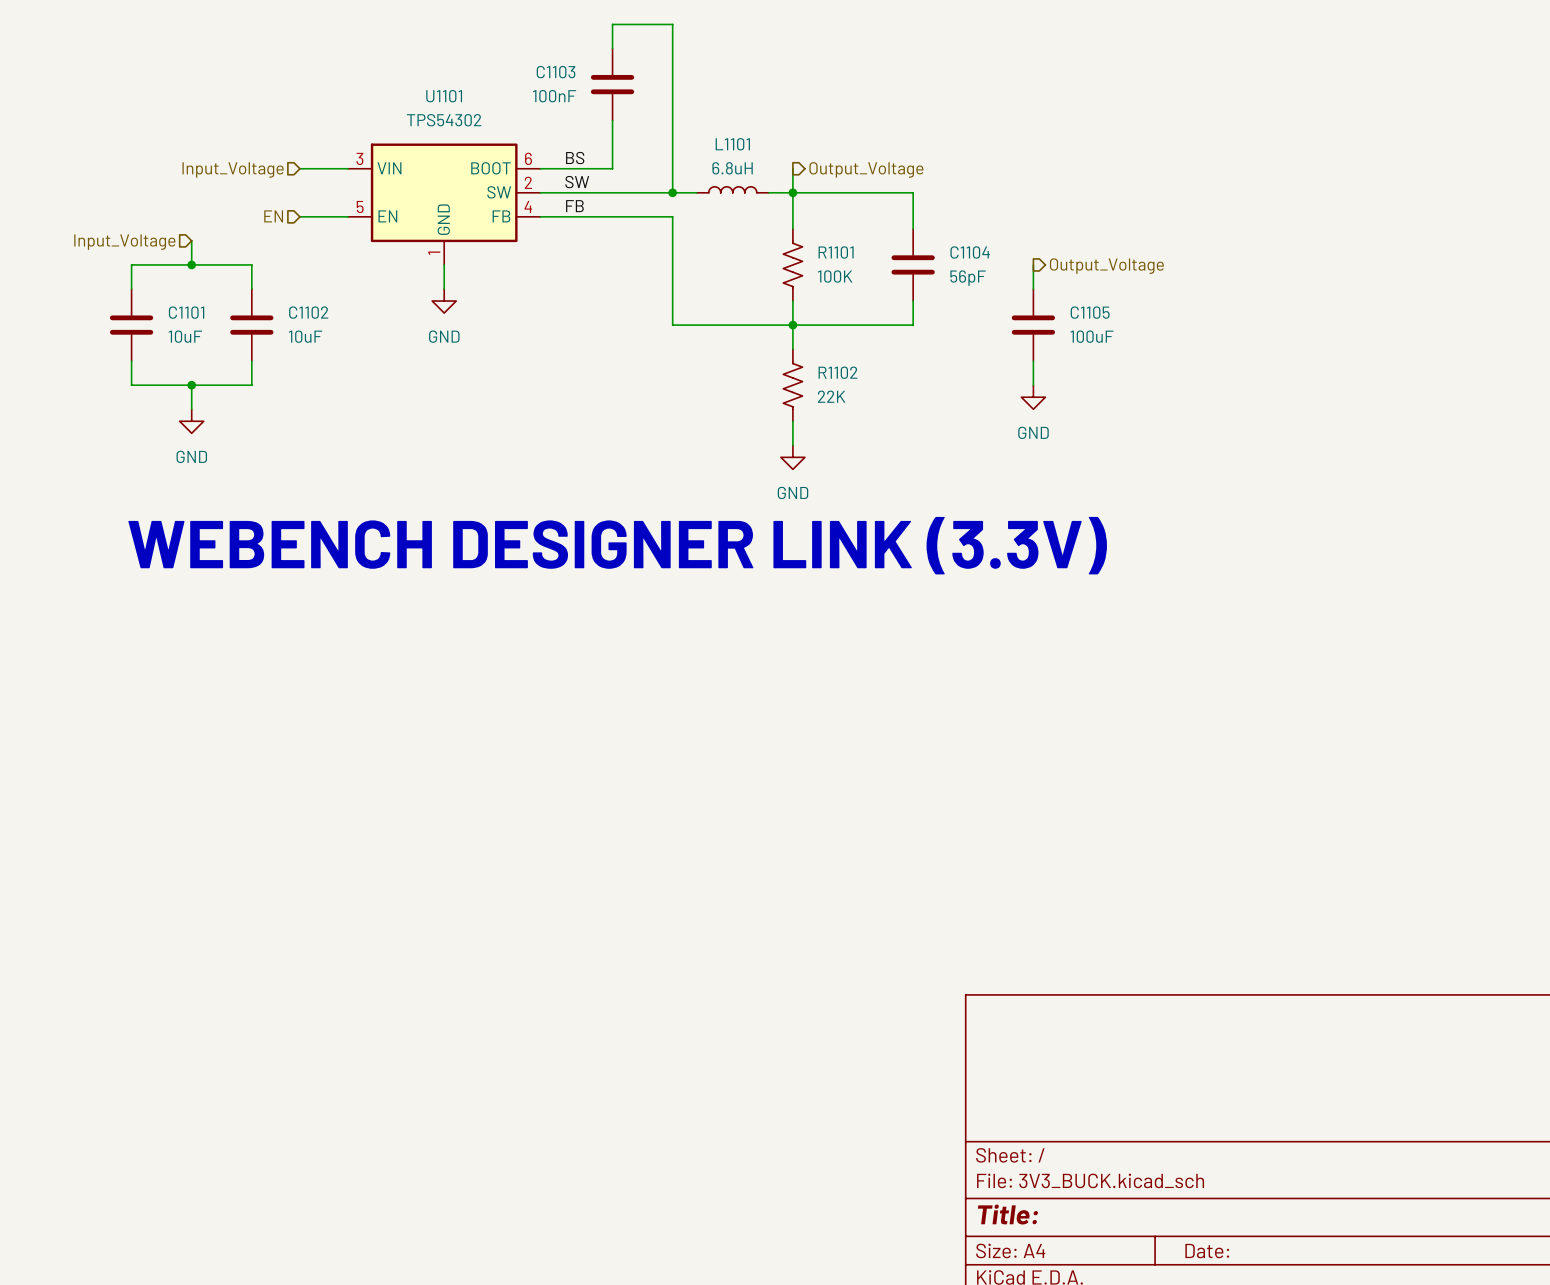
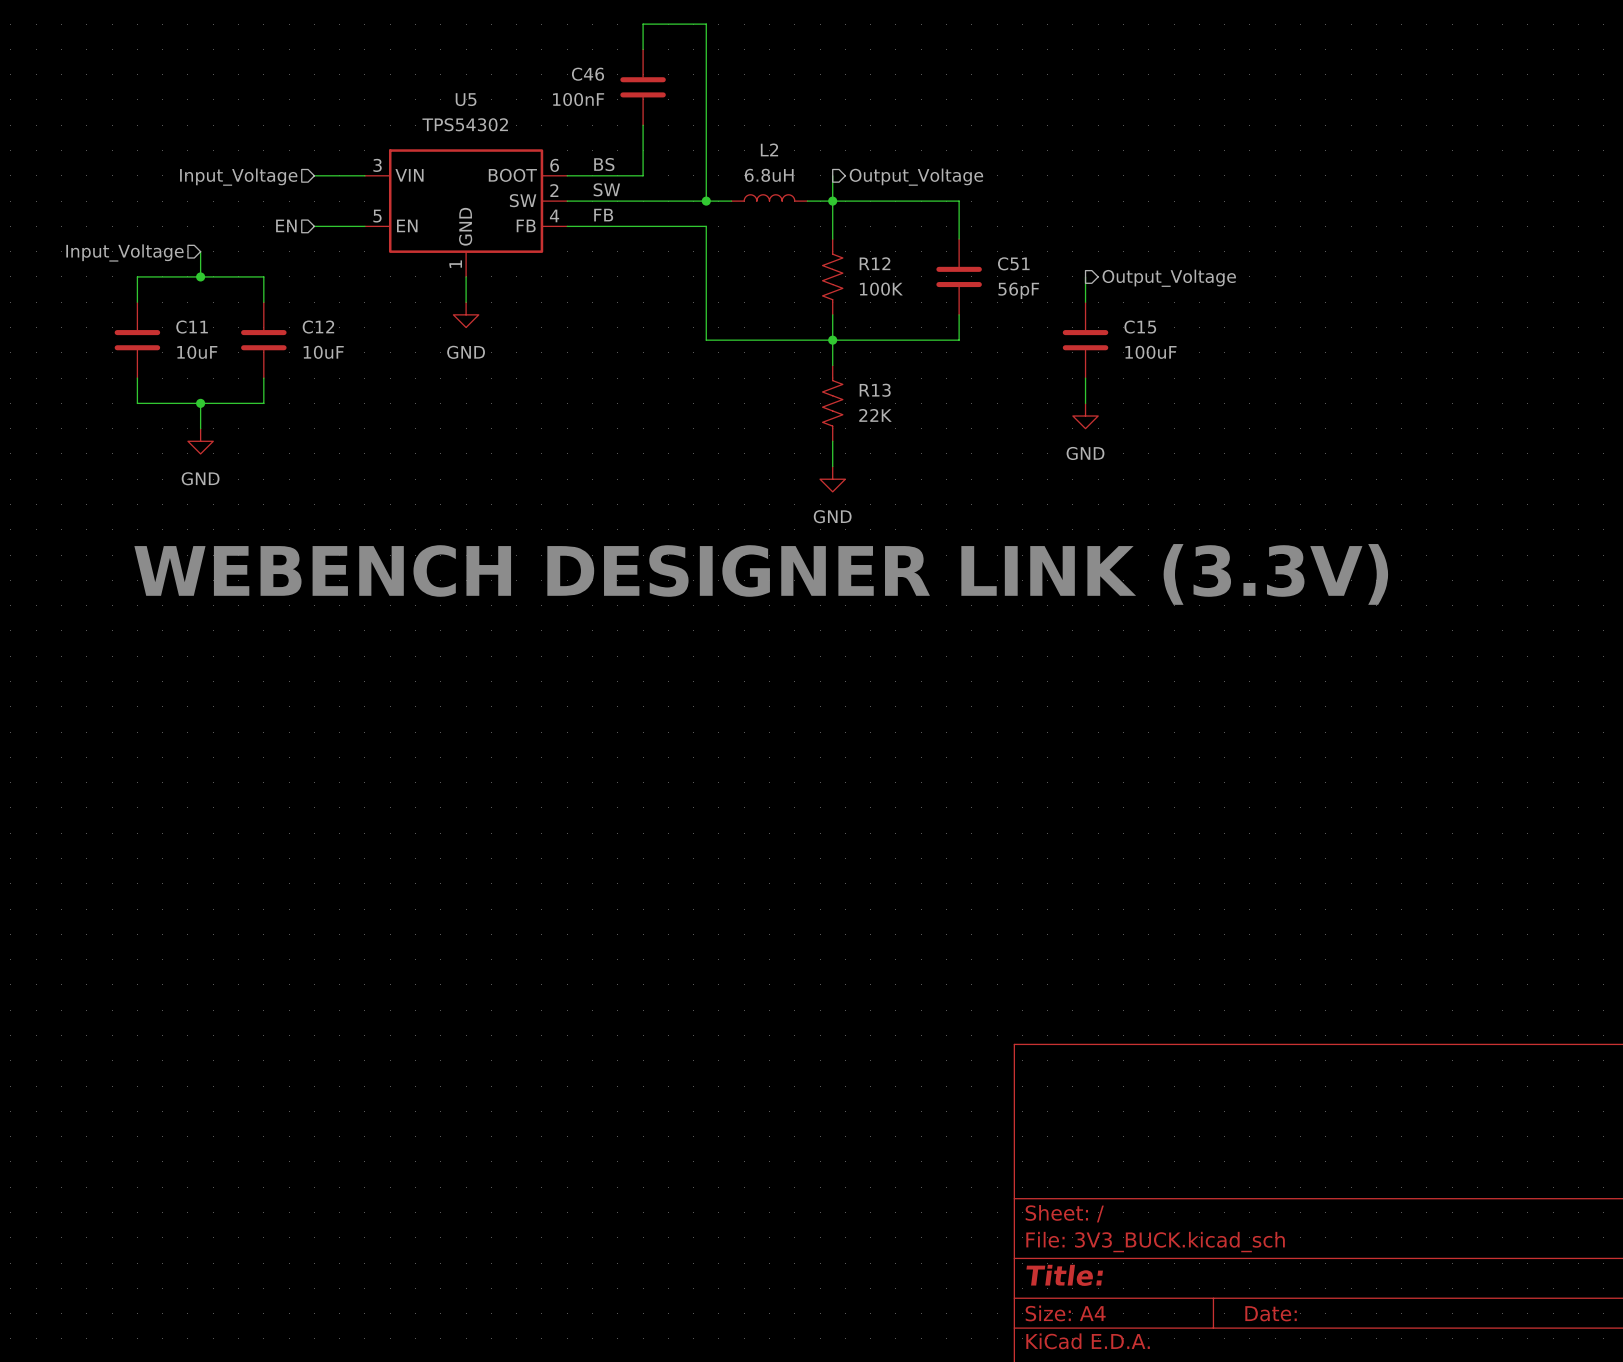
C1103 name: C1103 (556, 72) -> C46 (588, 74)
U1101 name: U1101 (444, 96) -> U5 (466, 99)
L1101 name: L1101 (732, 144) -> L2 (769, 149)
R1101 name: R1101 (836, 252) -> R12 (875, 263)
C1104 name: C1104 (970, 252) -> C51 (1013, 263)
C1101 name: C1101 (186, 312) -> C11 (192, 327)
C1102 name: C1102 (308, 312) -> C12 (318, 327)
C1105 name: C1105 (1090, 312) -> C15 (1140, 327)
R1102 name: R1102 (837, 372) -> R13 (875, 390)

